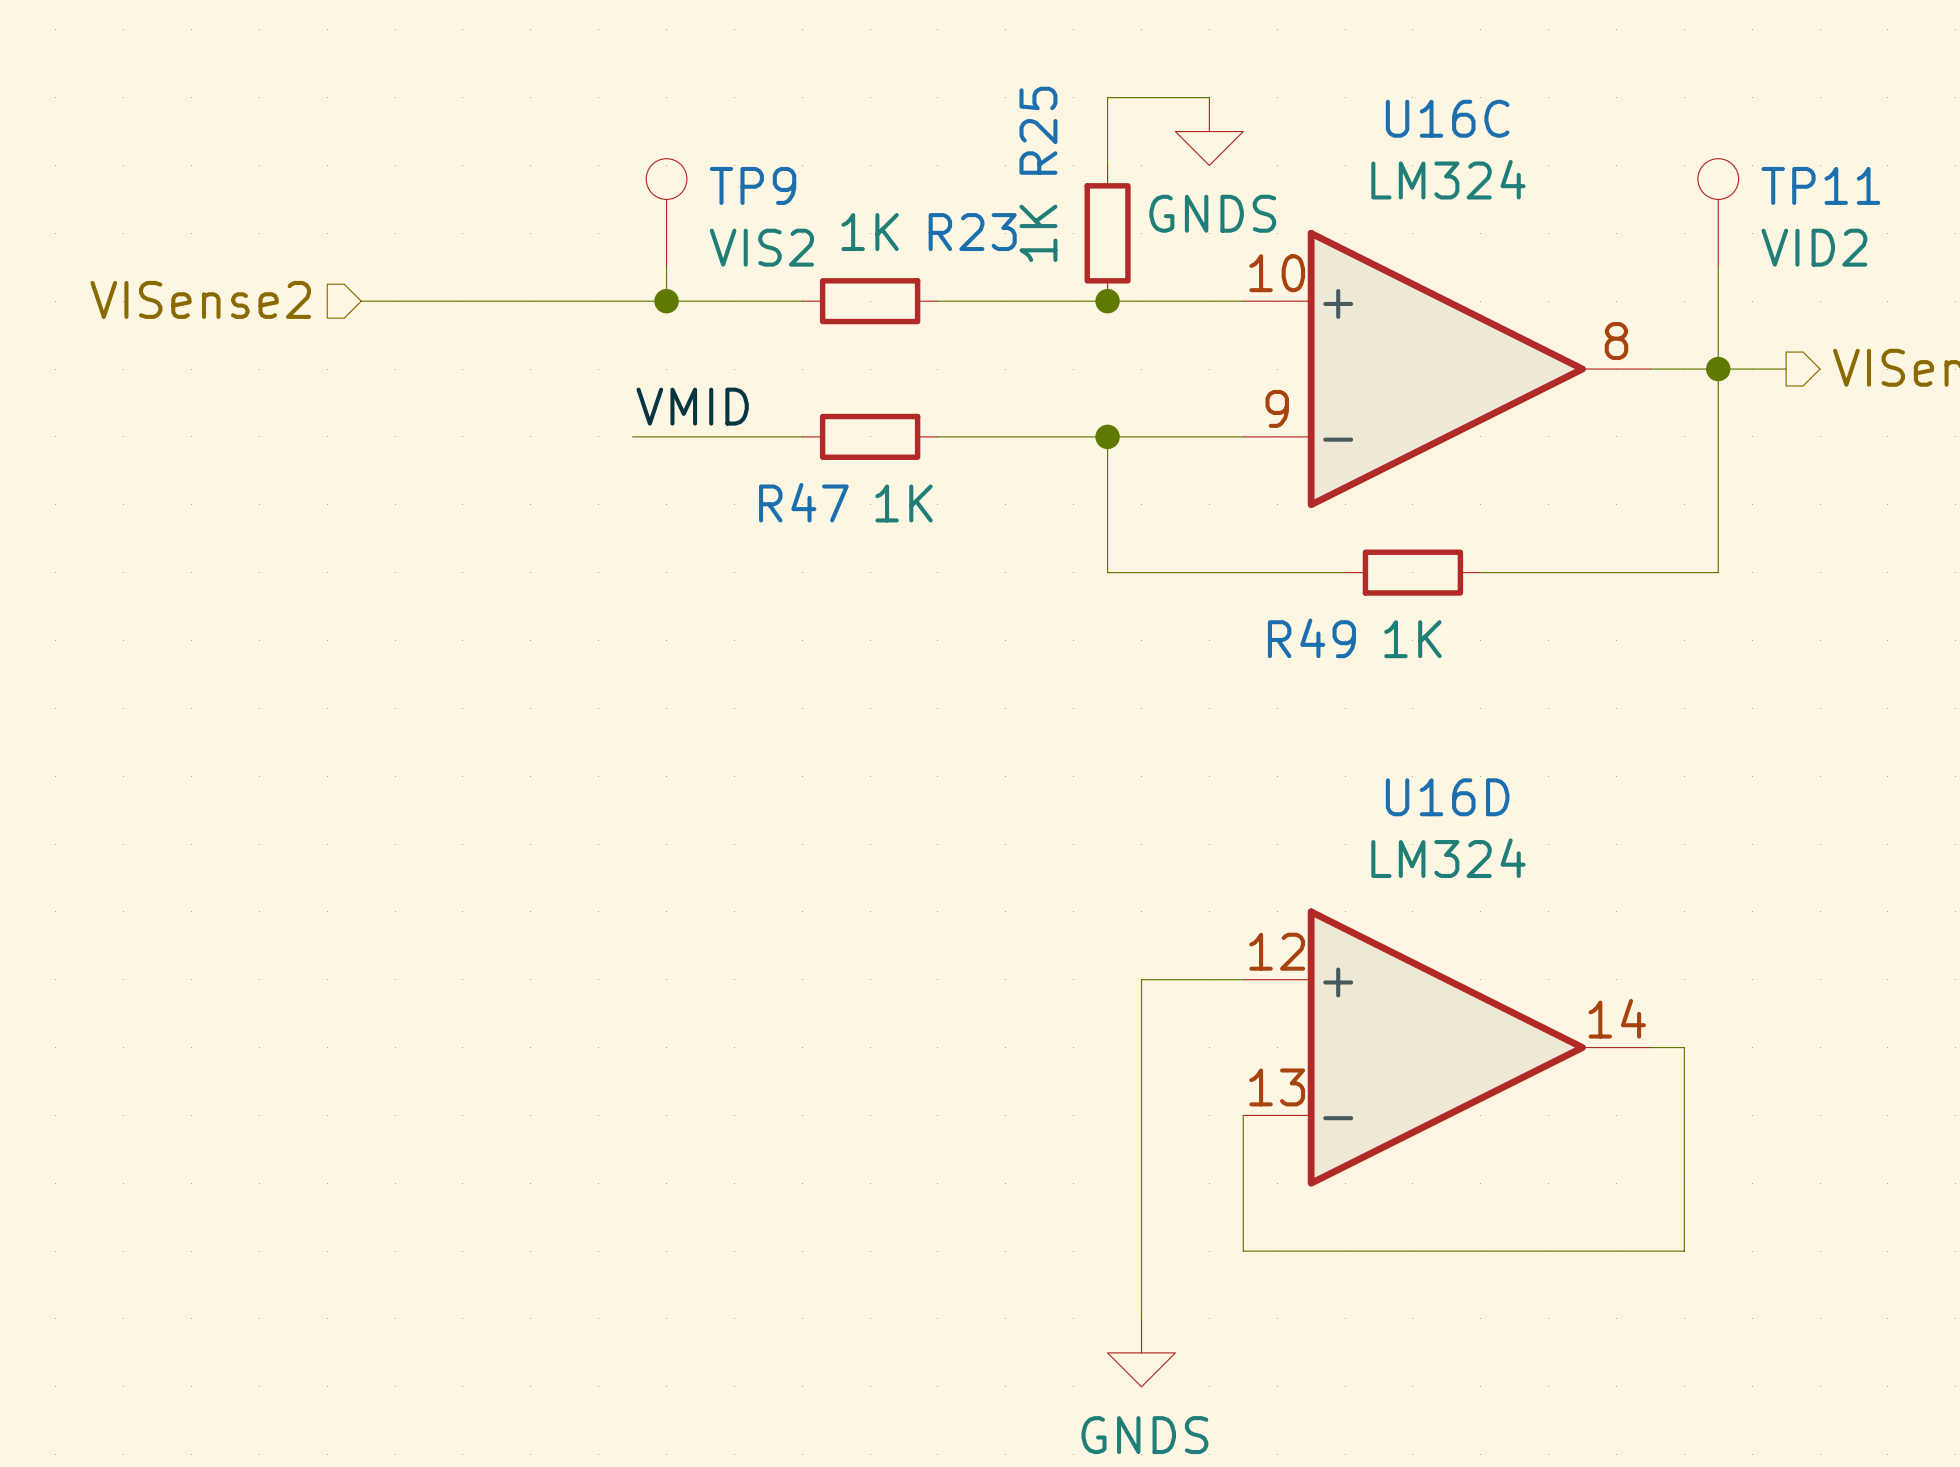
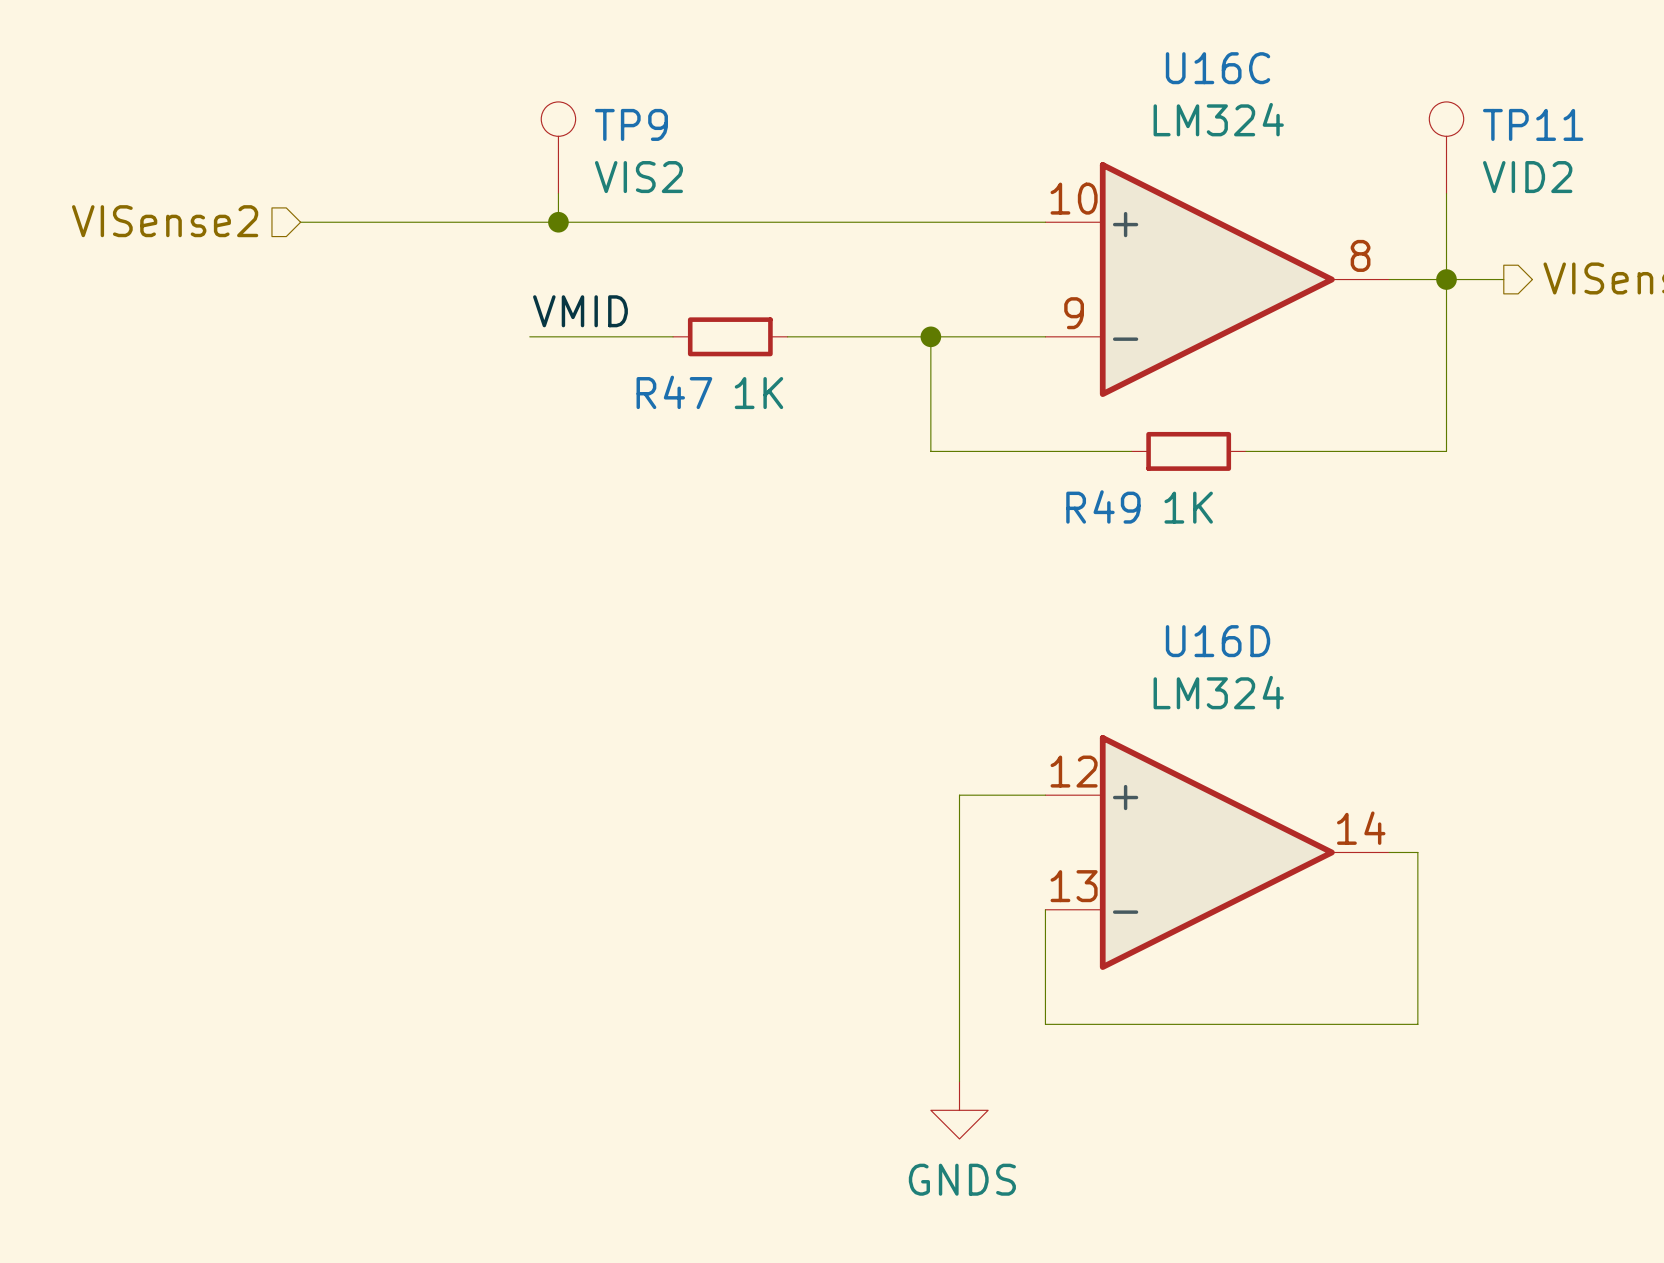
wire: (1209, 97) (1107, 97) (1107, 165) -> none
power symbol: GNDS (1209, 131) -> none
R25: 1K (1107, 233) -> none
wire: none -> (673, 222) (787, 222)
R23: 1K (870, 301) -> none
junction: (1107, 301) -> none

